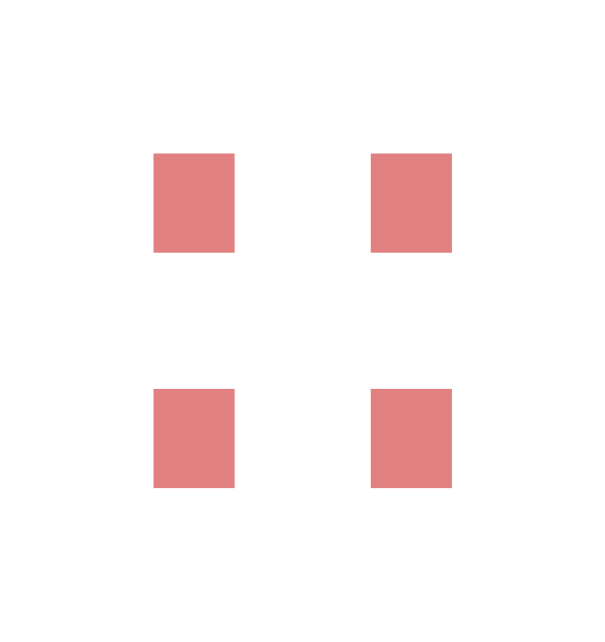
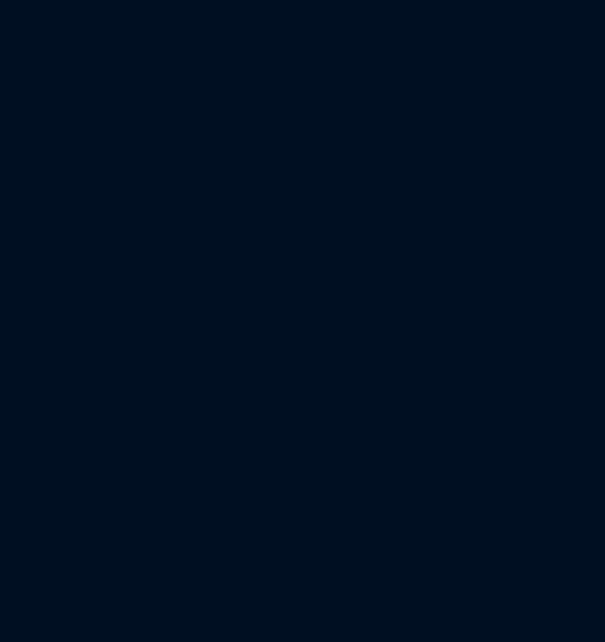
part: (302, 203) -> none
part: (302, 438) -> none

